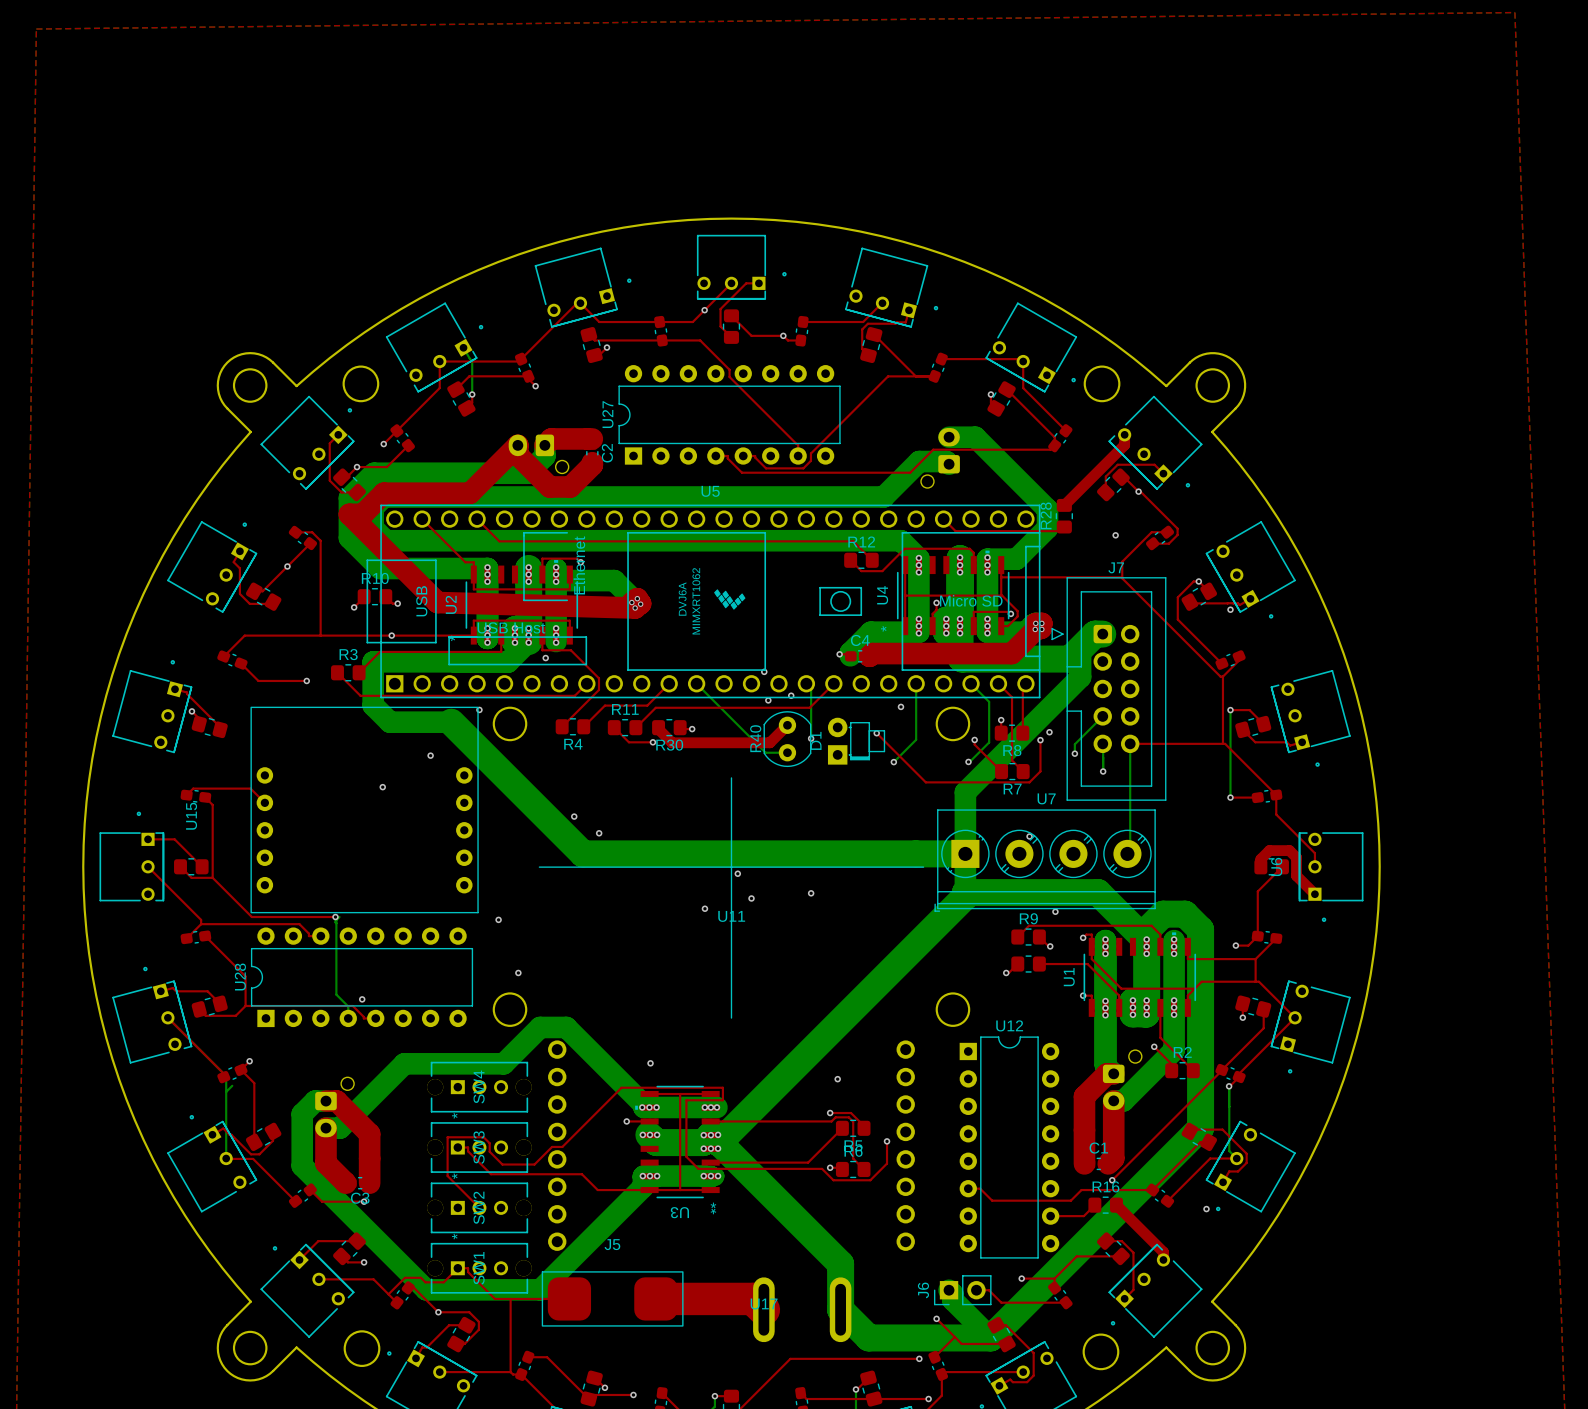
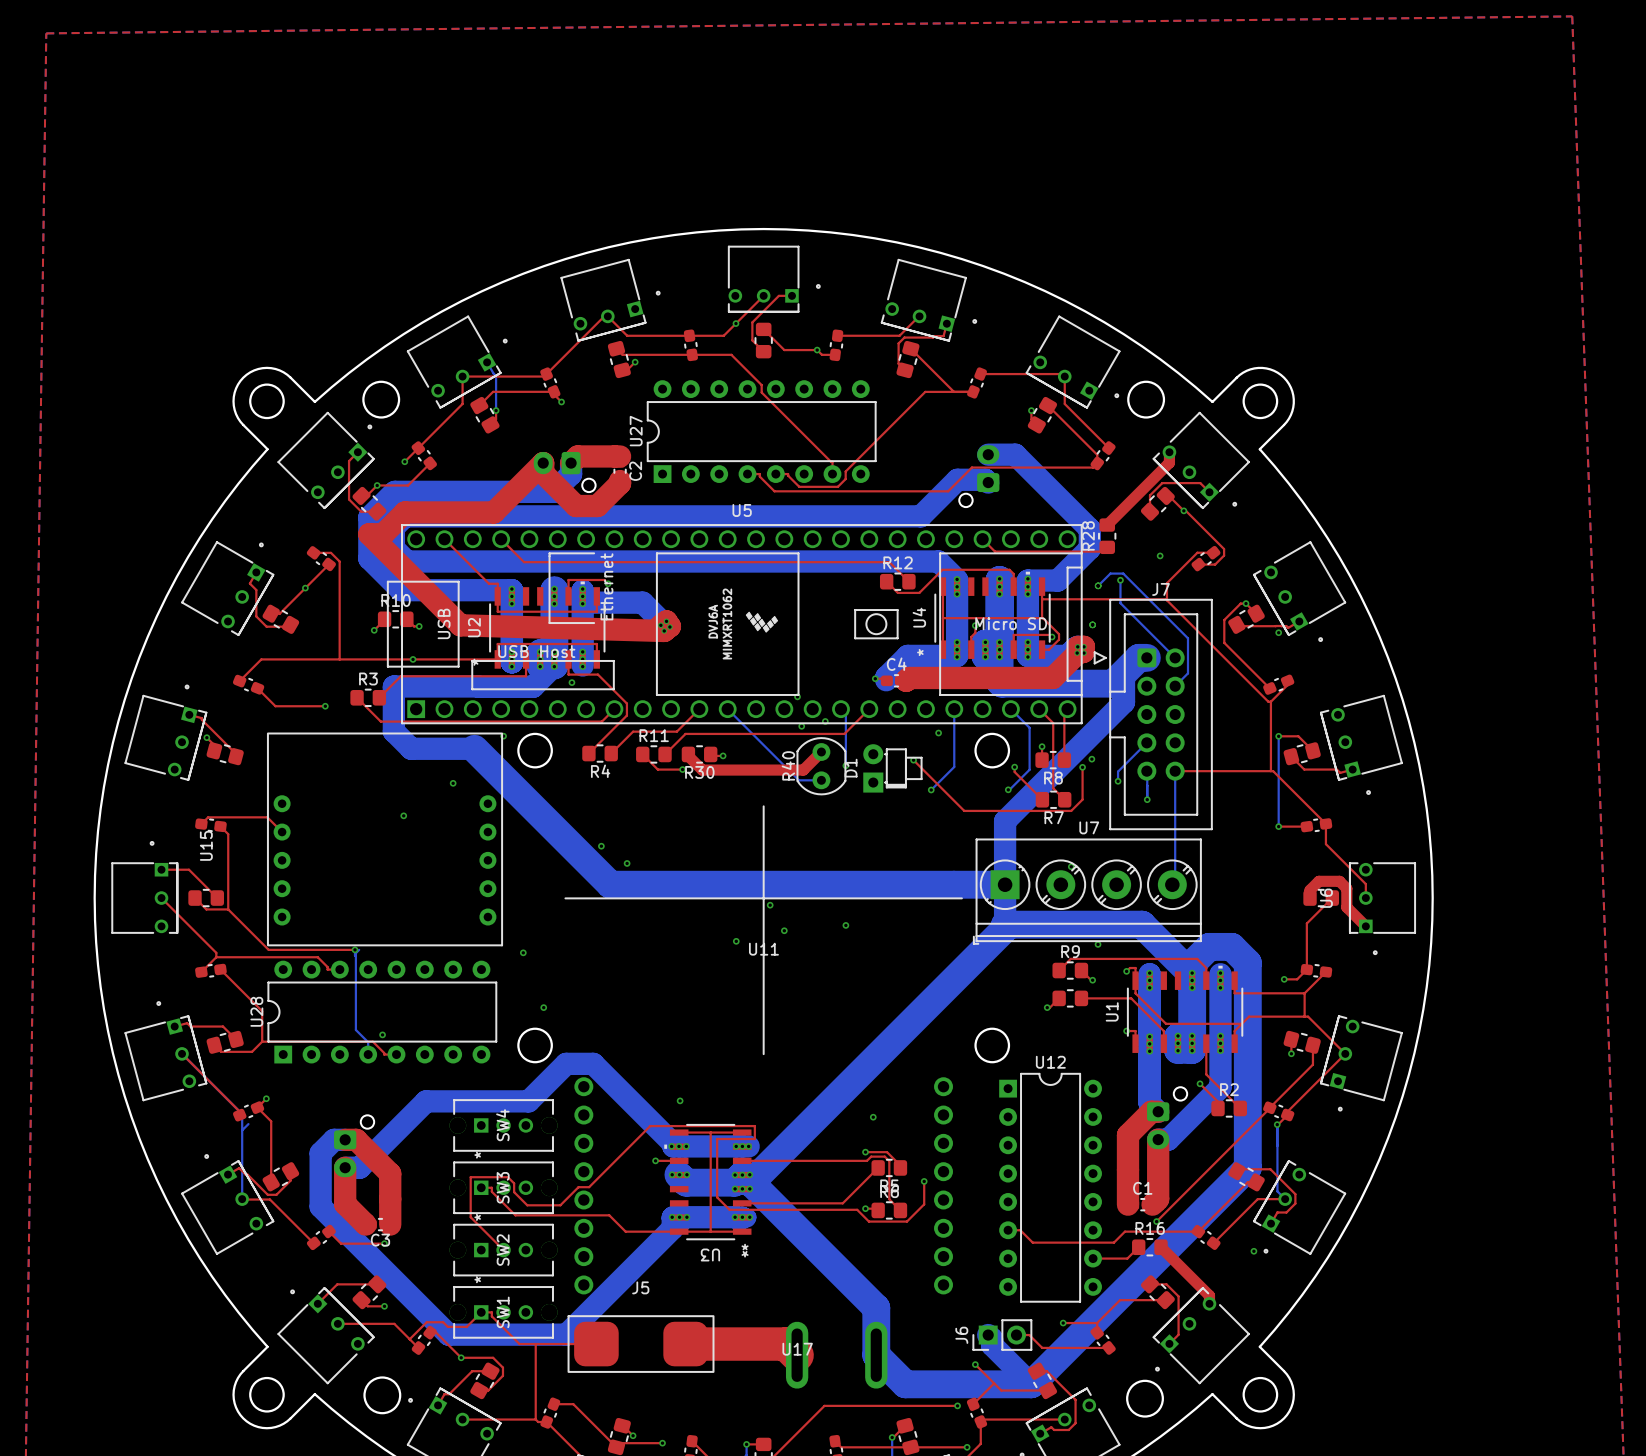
bottom track: none -> (1120, 580) (1120, 603) (1175, 657)
via: none -> (1120, 580)
bottom track: none -> (1098, 585) (1110, 573) (1123, 573) (1188, 638) (1188, 673) (1175, 686)
via: none -> (1098, 585)
via: none -> (1092, 624)

